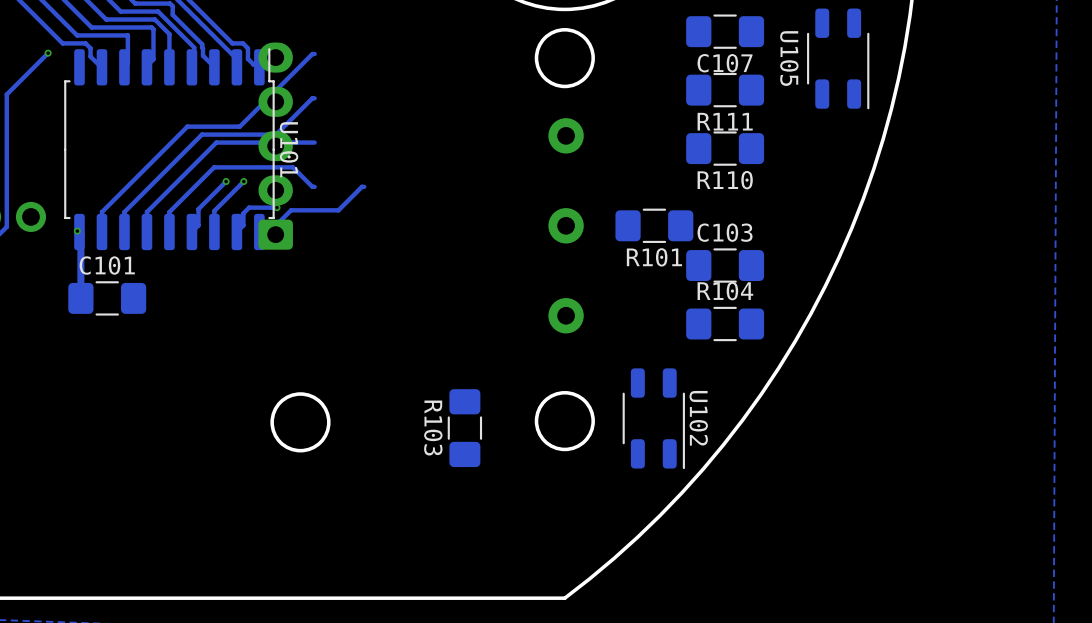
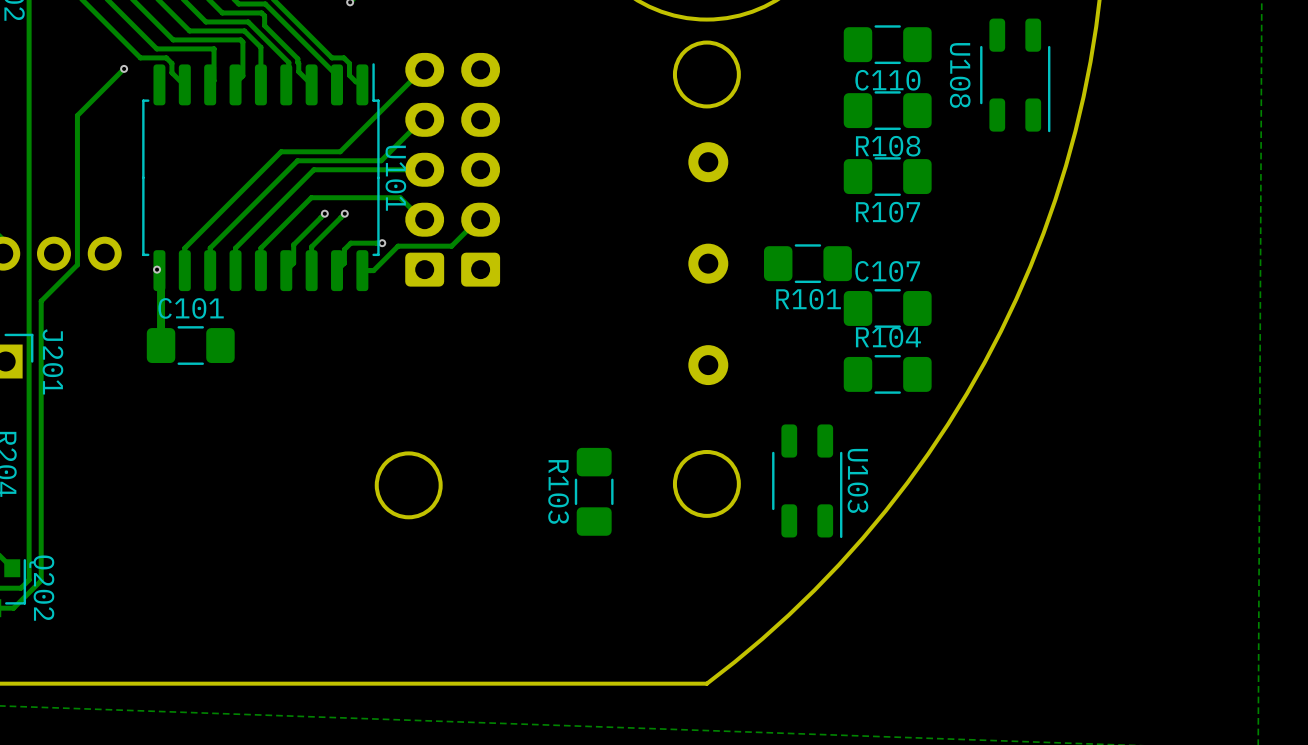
U105 name: U105 (789, 58) -> U108 (960, 75)
C107 name: C107 (725, 63) -> C110 (887, 80)
R111 name: R111 (725, 121) -> R108 (888, 146)
part: none -> (480, 169)
part position: (275, 146) -> (424, 169)
R110 name: R110 (725, 180) -> R107 (887, 212)
C103 name: C103 (725, 232) -> C107 (887, 271)
U102 name: U102 (698, 418) -> U103 (857, 480)

